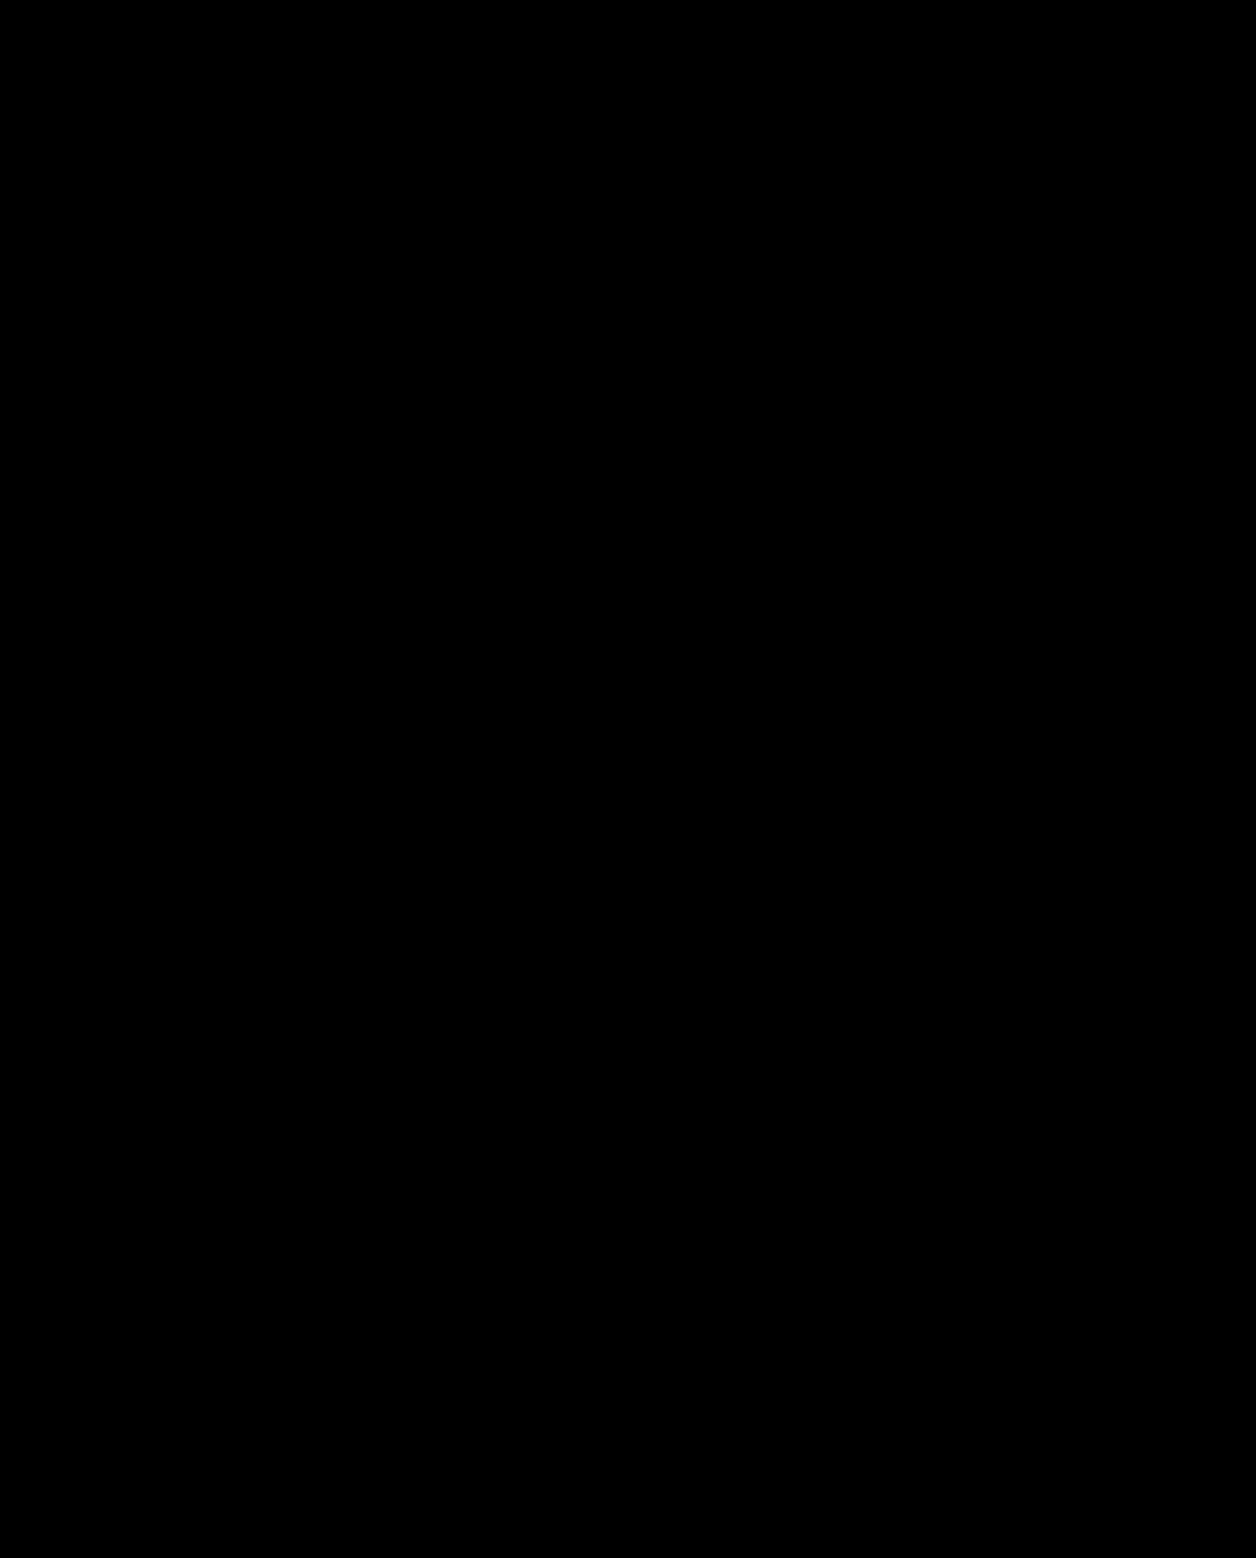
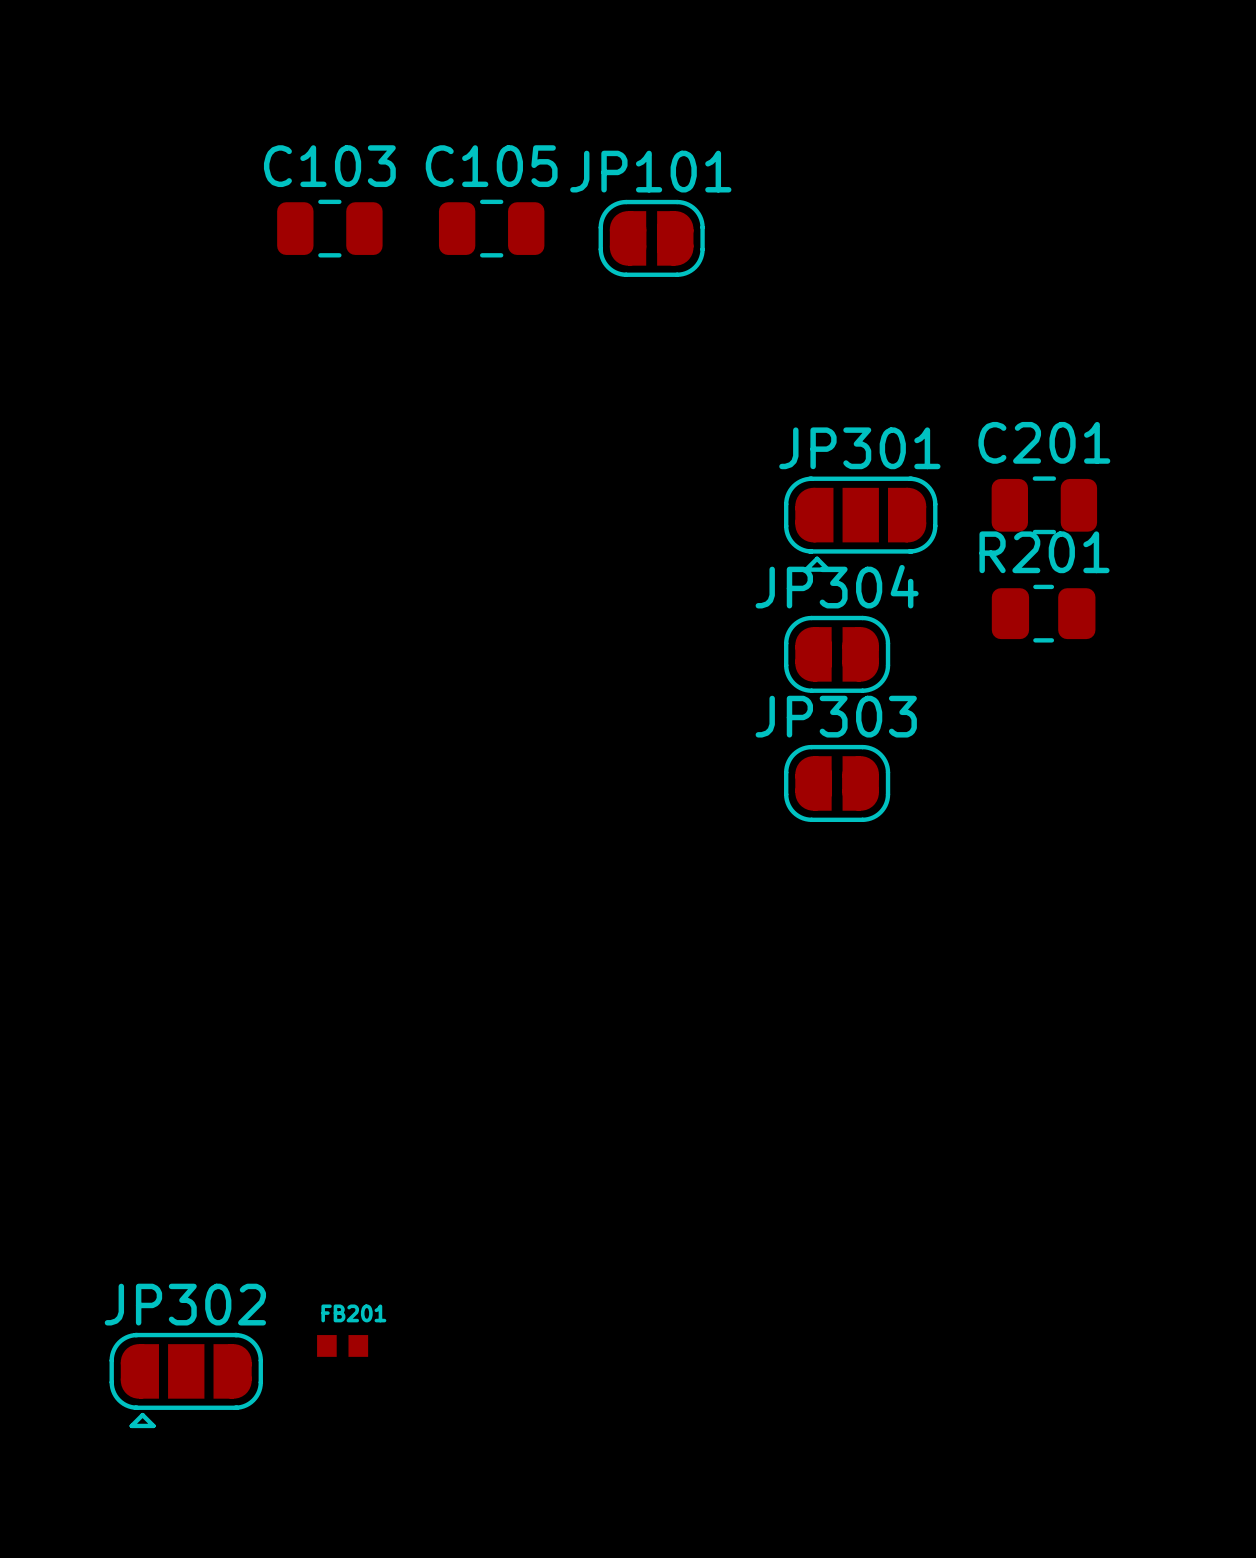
C103: none -> (329, 228)
C105: none -> (491, 228)
JP101: none -> (651, 238)
C201: none -> (1044, 505)
JP301: none -> (860, 524)
R201: none -> (1043, 613)
JP304: none -> (837, 654)
JP303: none -> (837, 783)
FB201: none -> (342, 1345)
JP302: none -> (186, 1380)

